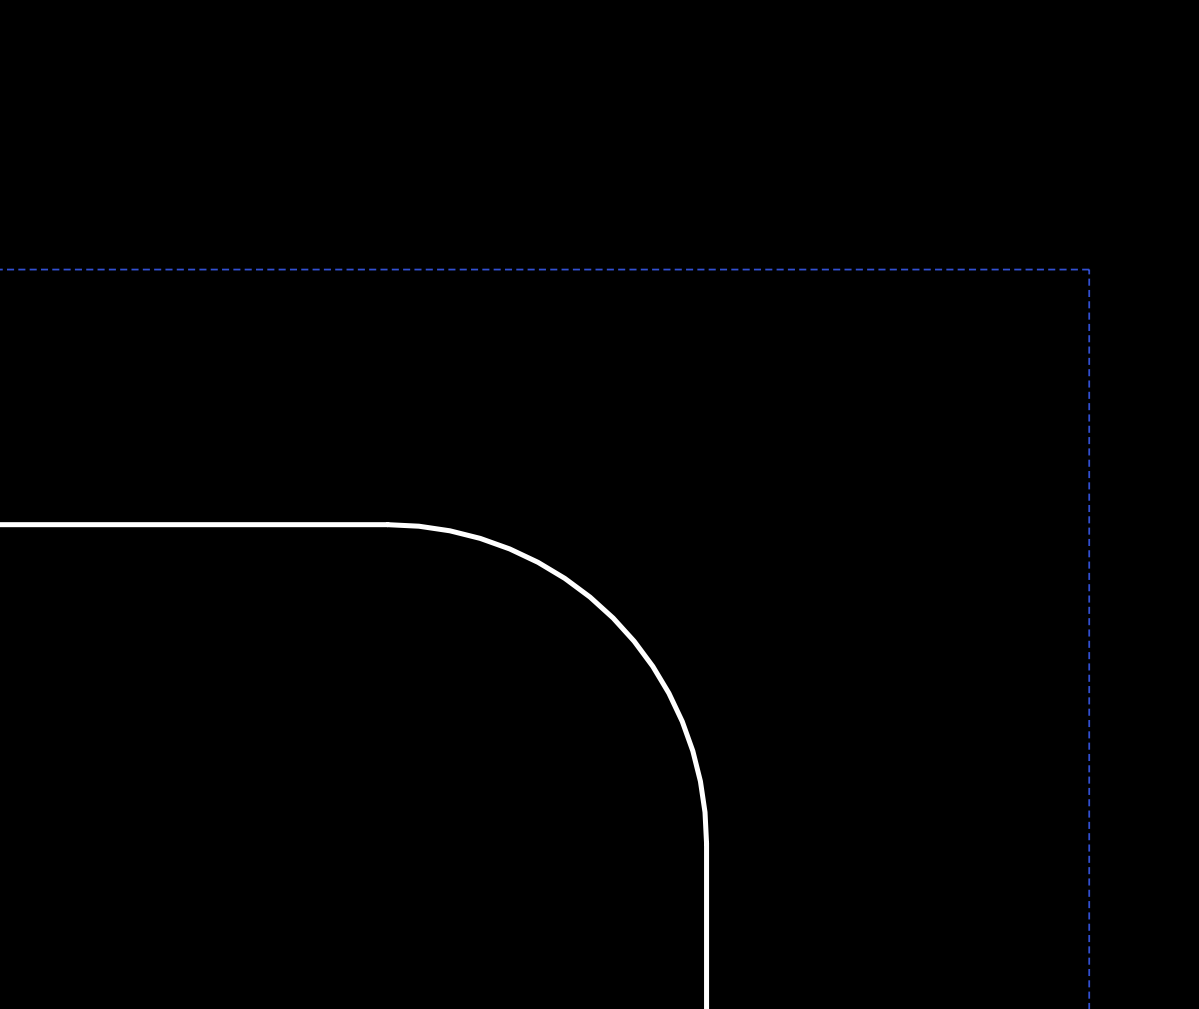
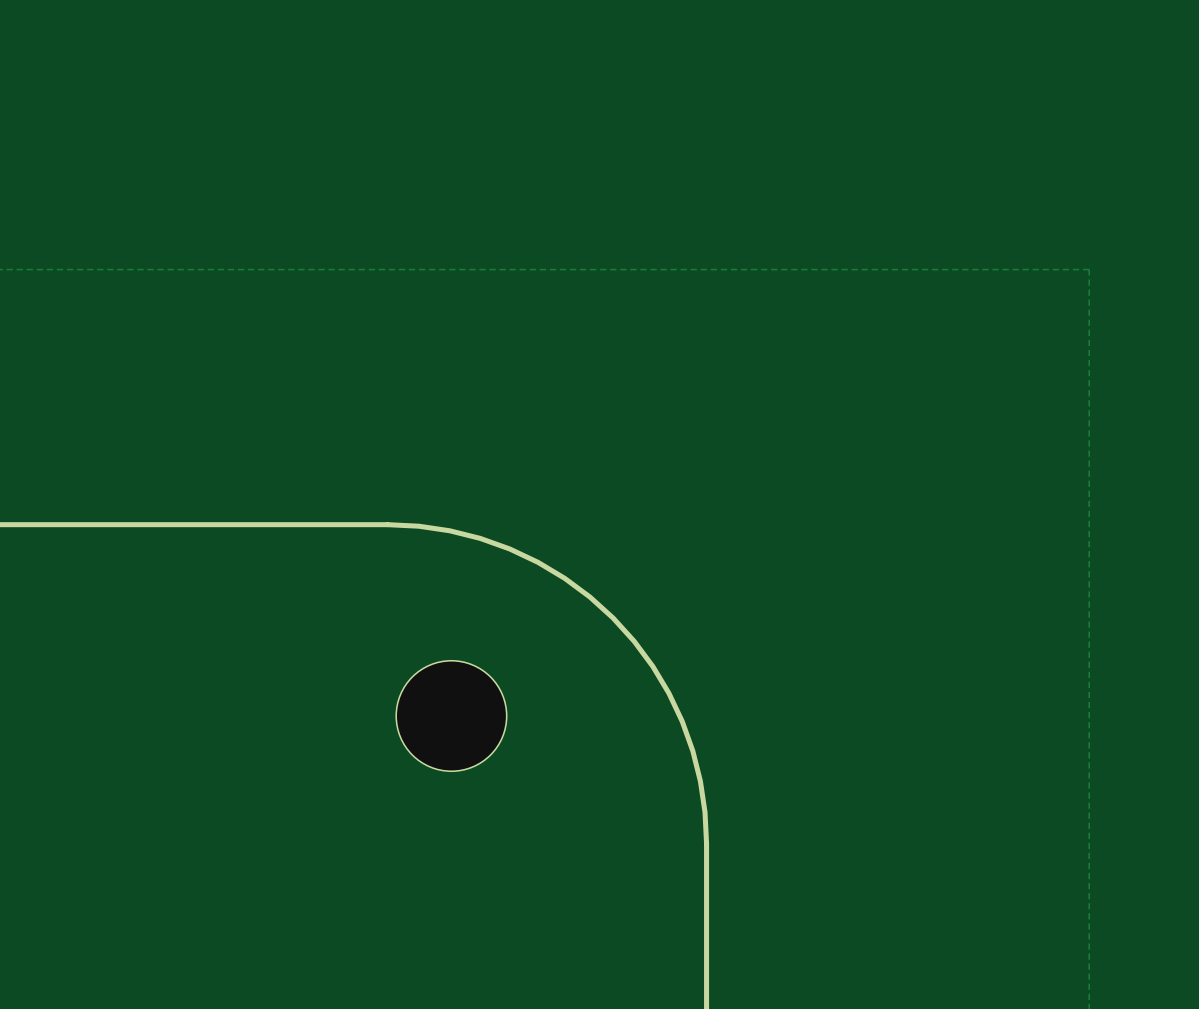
part: none -> (451, 716)

